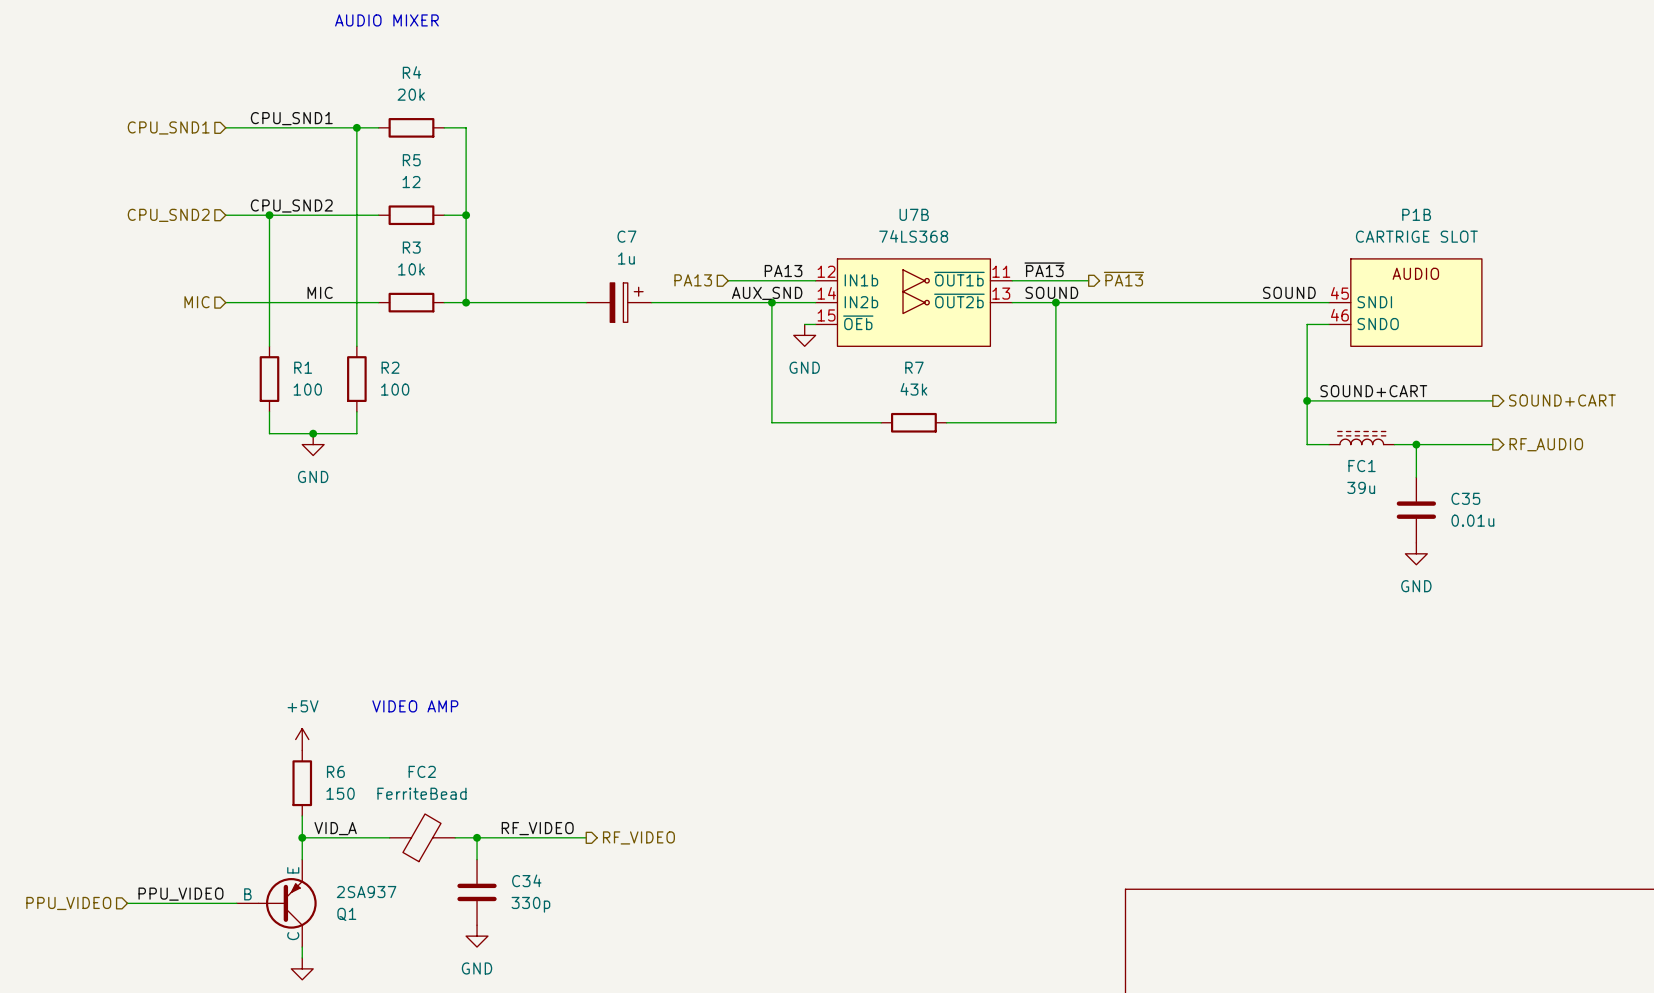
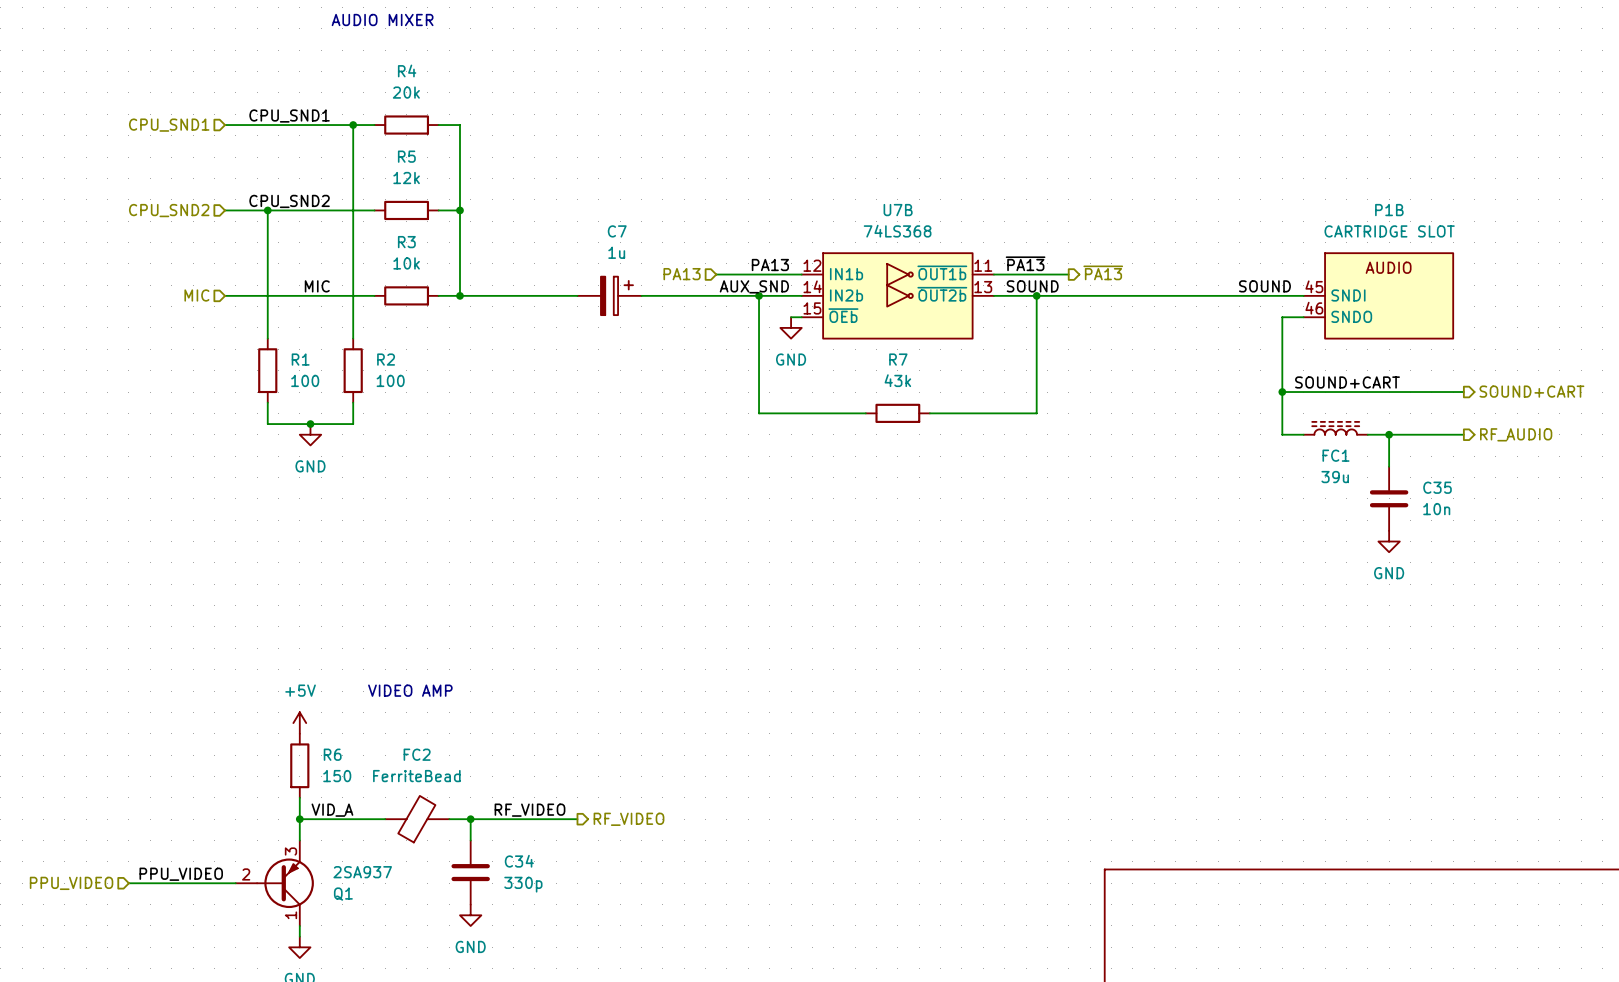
R5 value: 12 (411, 182) -> 12k (406, 178)
P1B value: CARTRIGE SLOT (1416, 236) -> CARTRIDGE SLOT (1389, 231)
C35 value: 0.01u (1472, 520) -> 10n (1436, 509)
Q1 symbol: [236, 859, 317, 948] -> [235, 840, 314, 926]

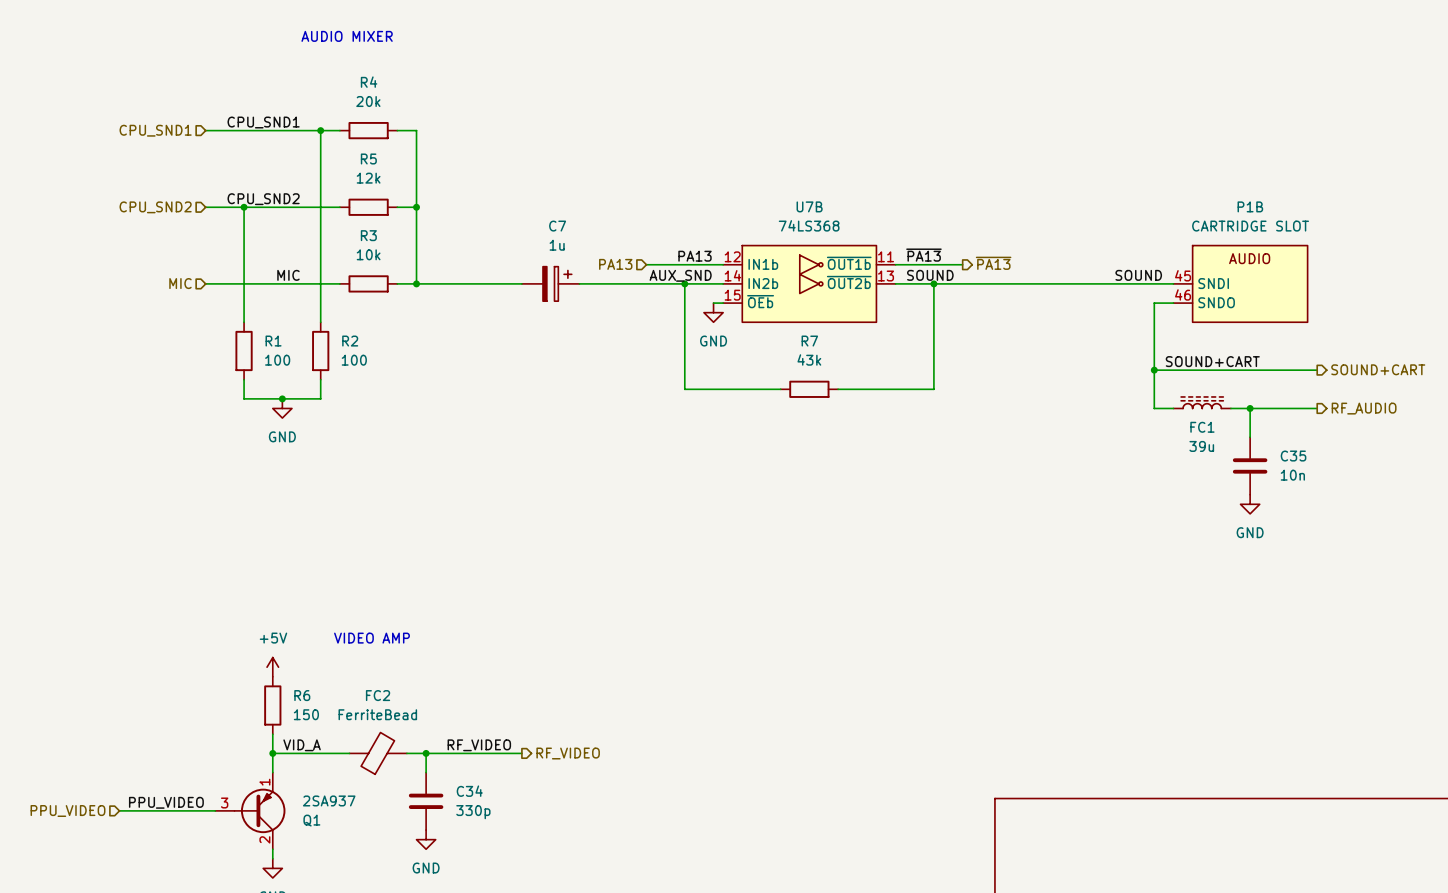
Q1 pin number: 3 (290, 851) -> 1 (264, 782)
Q1 pin number: 2 (246, 874) -> 3 (224, 803)
Q1 pin number: 1 (290, 915) -> 2 (264, 839)

